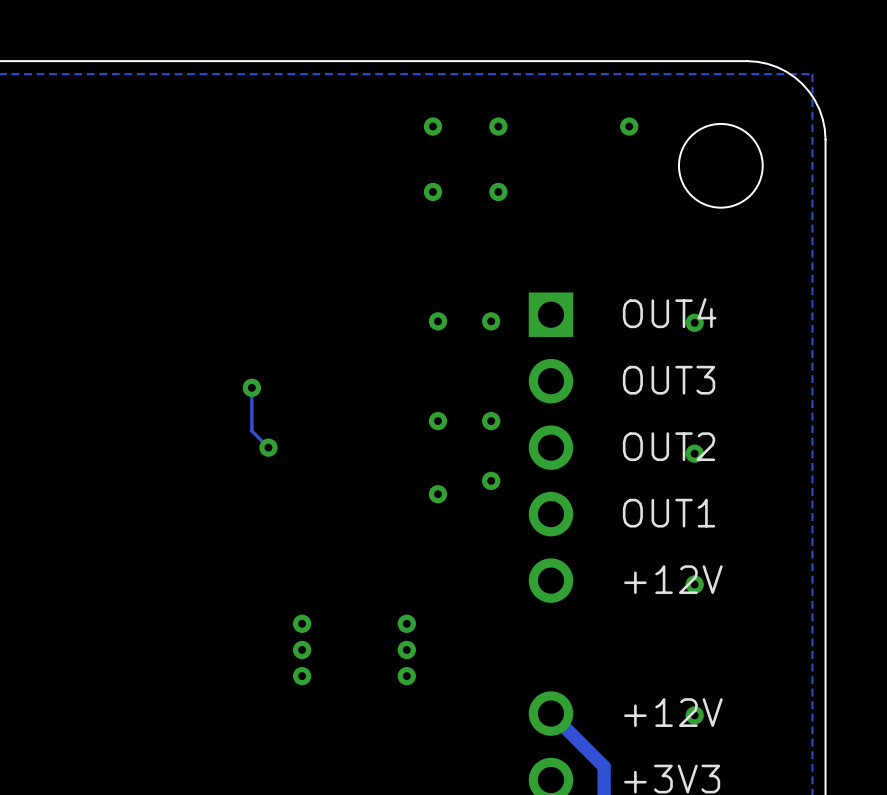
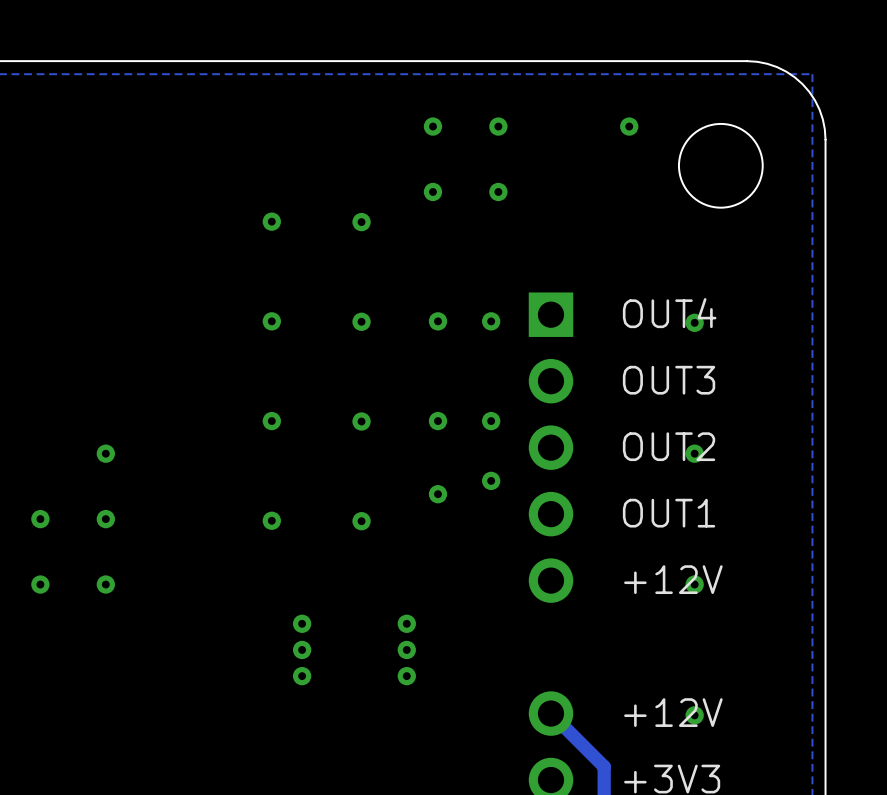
via: none -> (271, 221)
via: none -> (361, 222)
via: none -> (271, 321)
via: none -> (361, 321)
track: (251, 387) (251, 431) (268, 447) -> none
via: (251, 387) -> none
via: none -> (271, 421)
via: none -> (361, 421)
via: (268, 447) -> none
via: none -> (105, 453)
via: none -> (40, 519)
via: none -> (105, 519)
via: none -> (271, 520)
via: none -> (361, 521)
via: none -> (40, 584)
via: none -> (105, 584)

